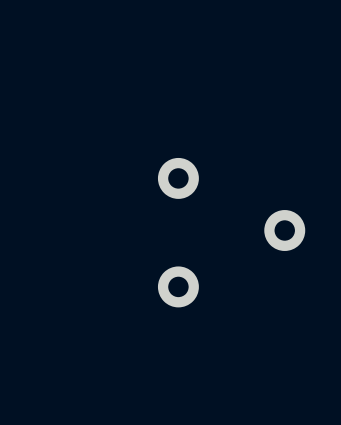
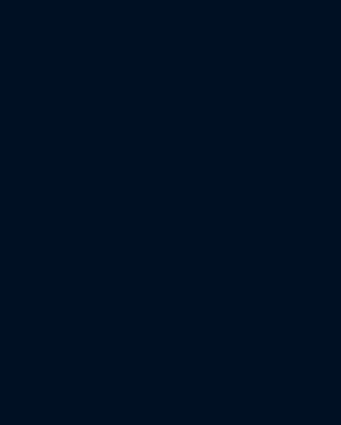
round board edge: [157, 157, 199, 199] -> none
round board edge: [264, 210, 306, 251] -> none
round board edge: [157, 266, 199, 308] -> none

